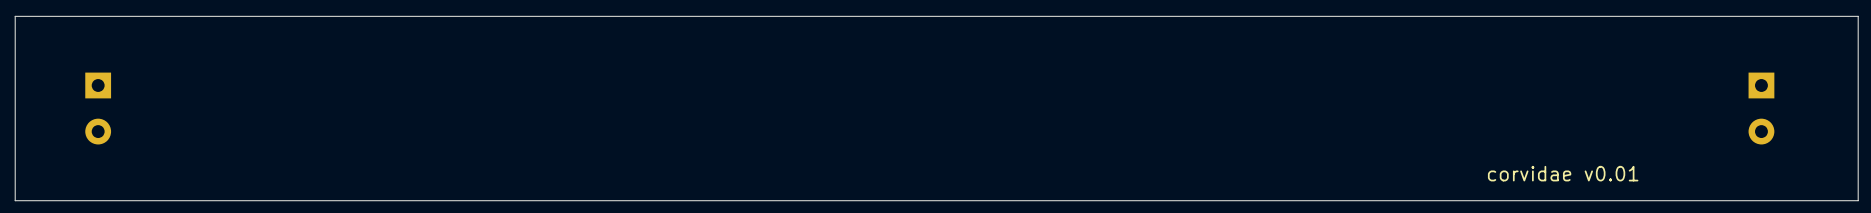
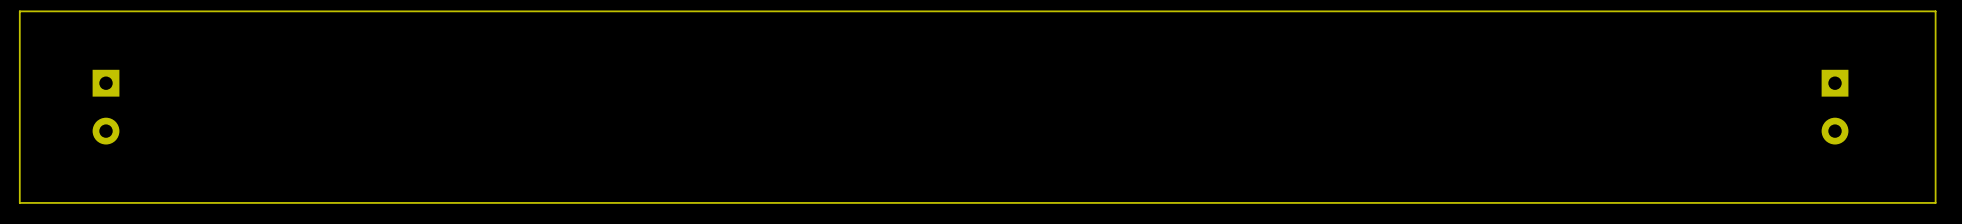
text: corvidae v0.01 (1563, 173) -> none

